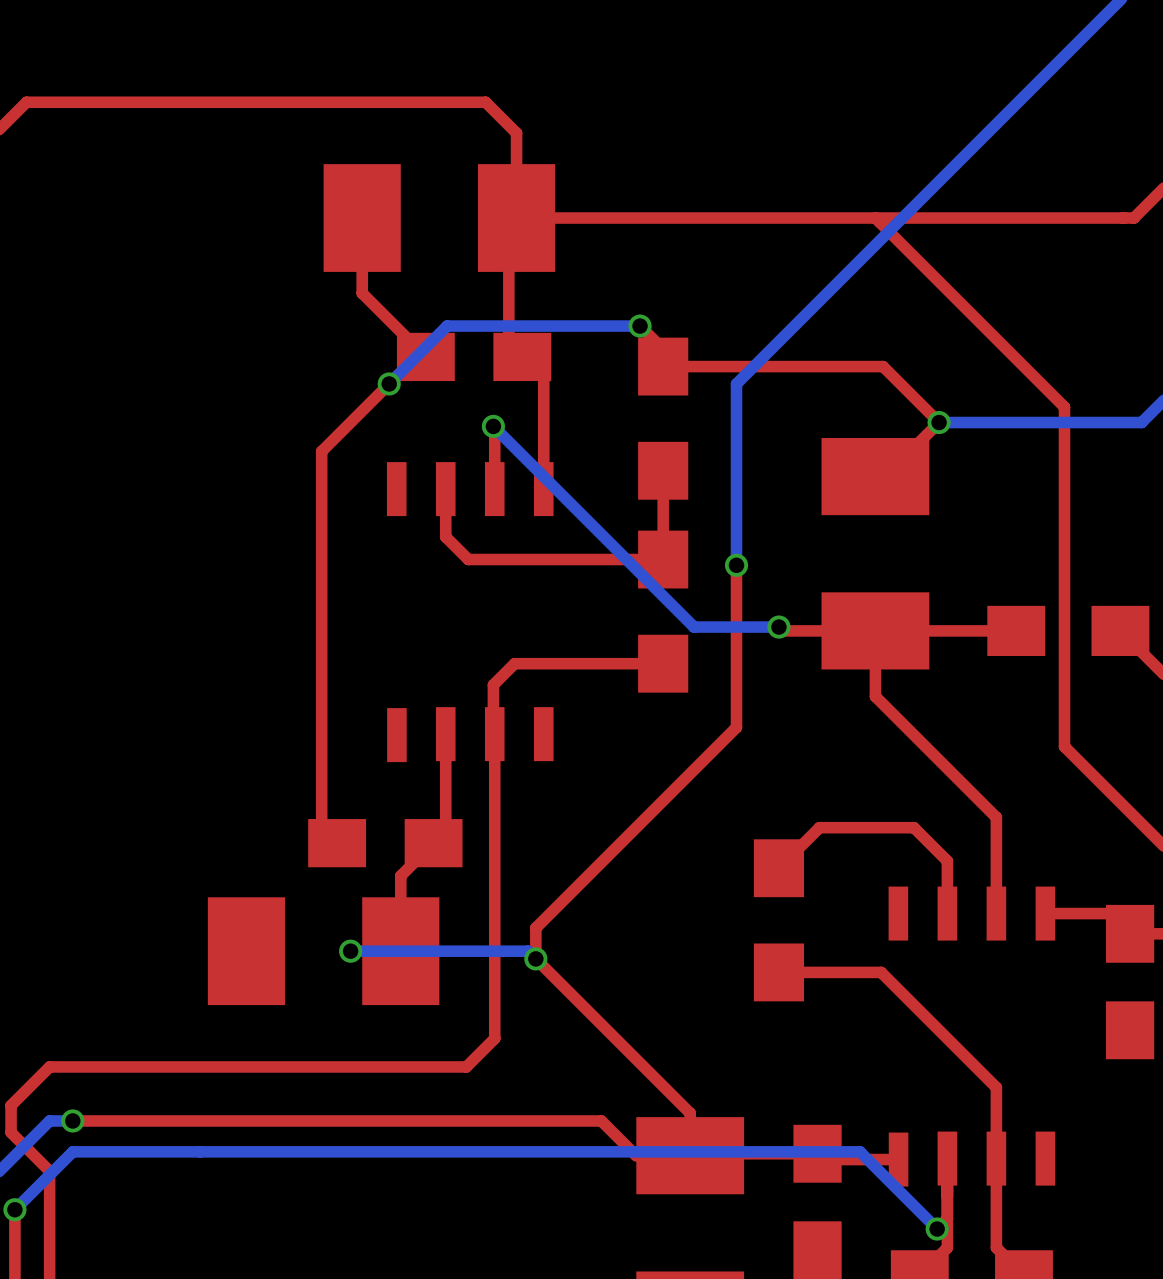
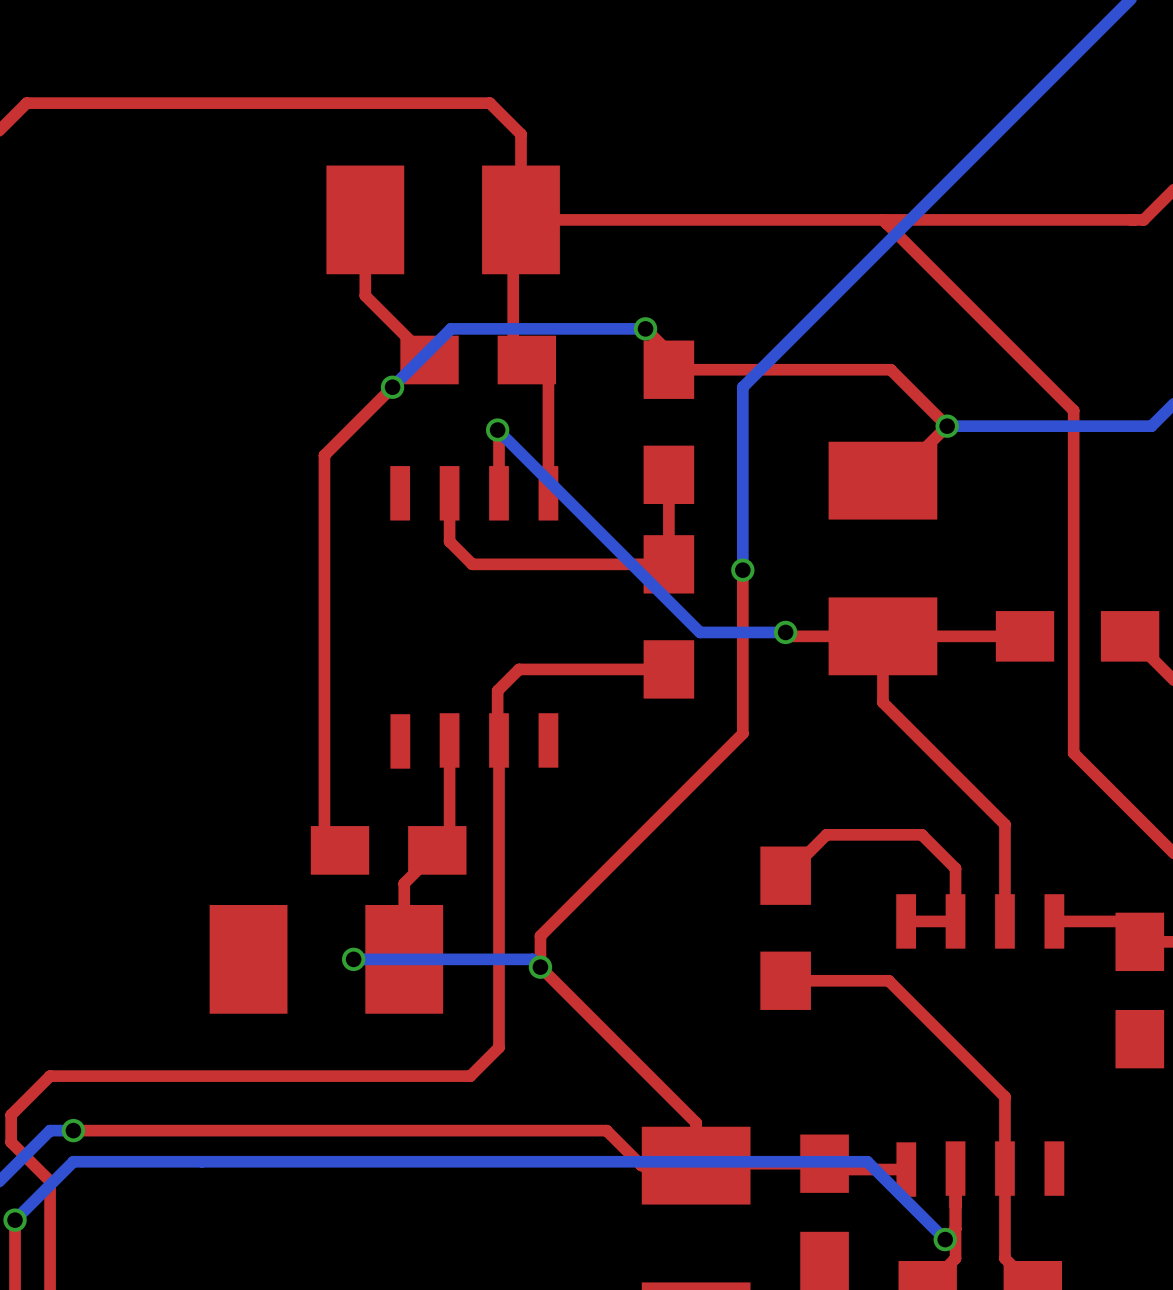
top track: none -> (955, 921) (906, 921)

